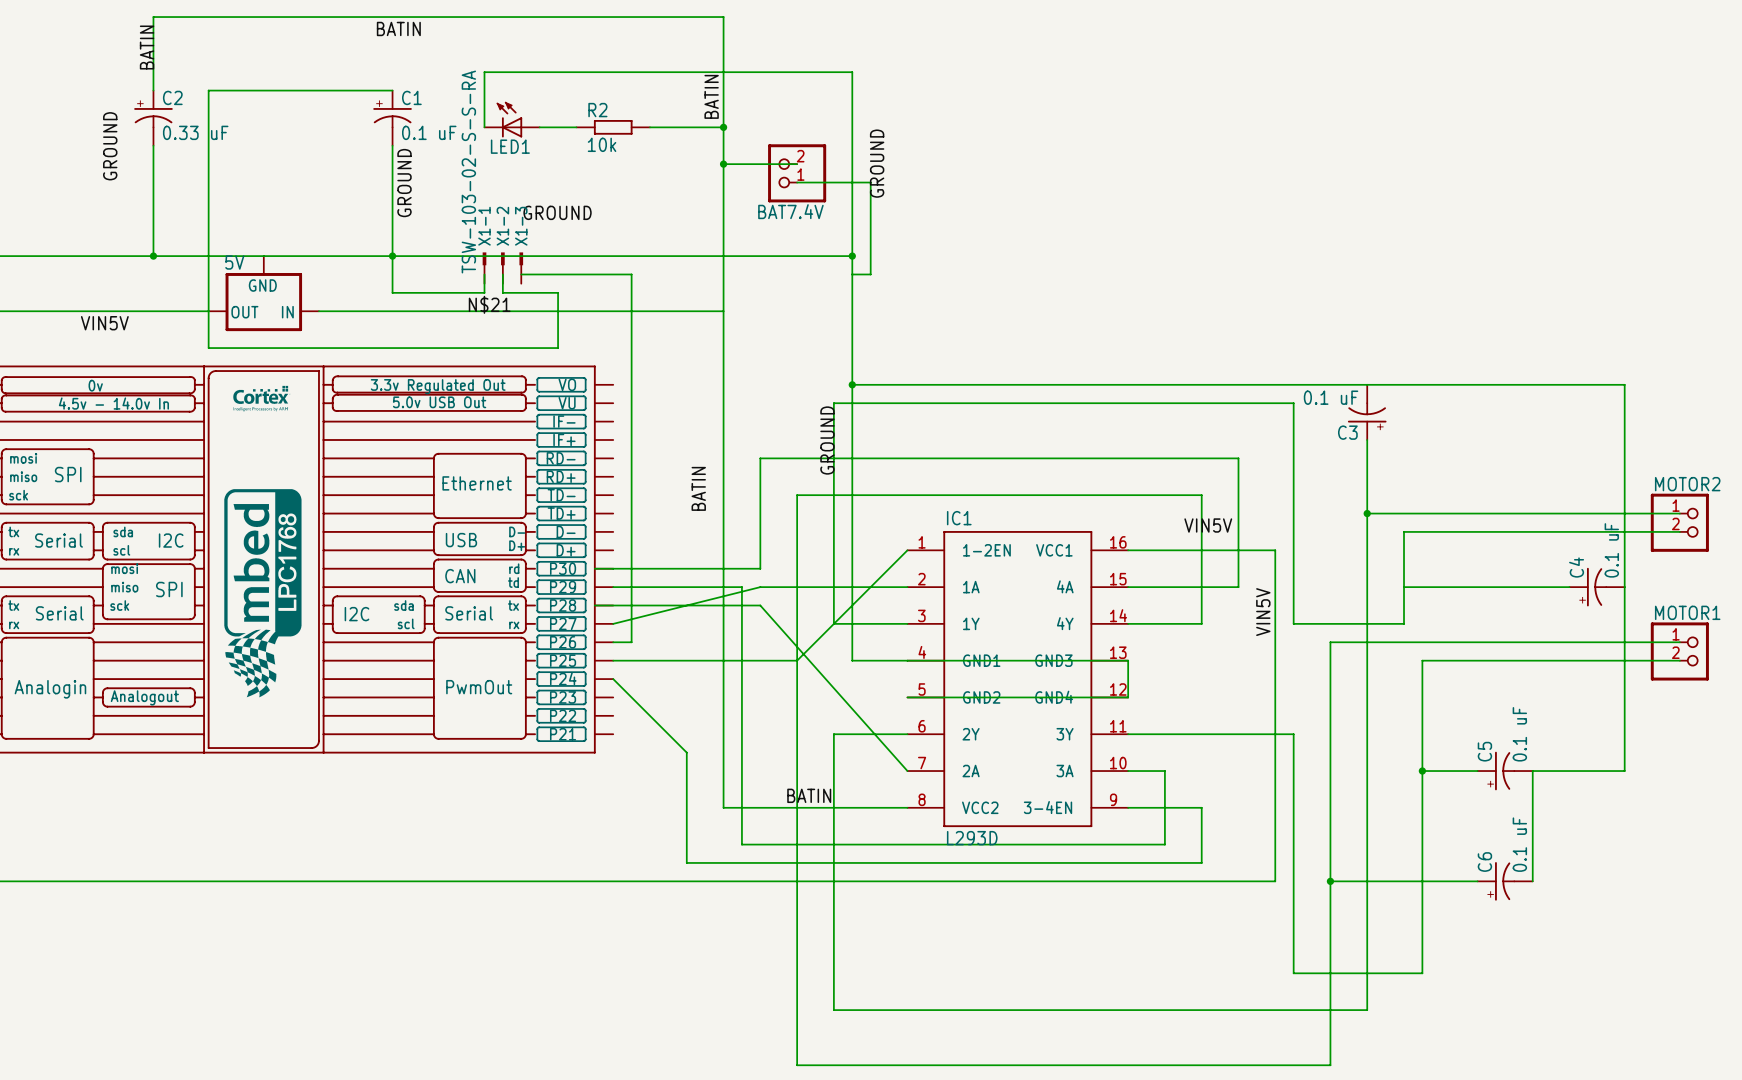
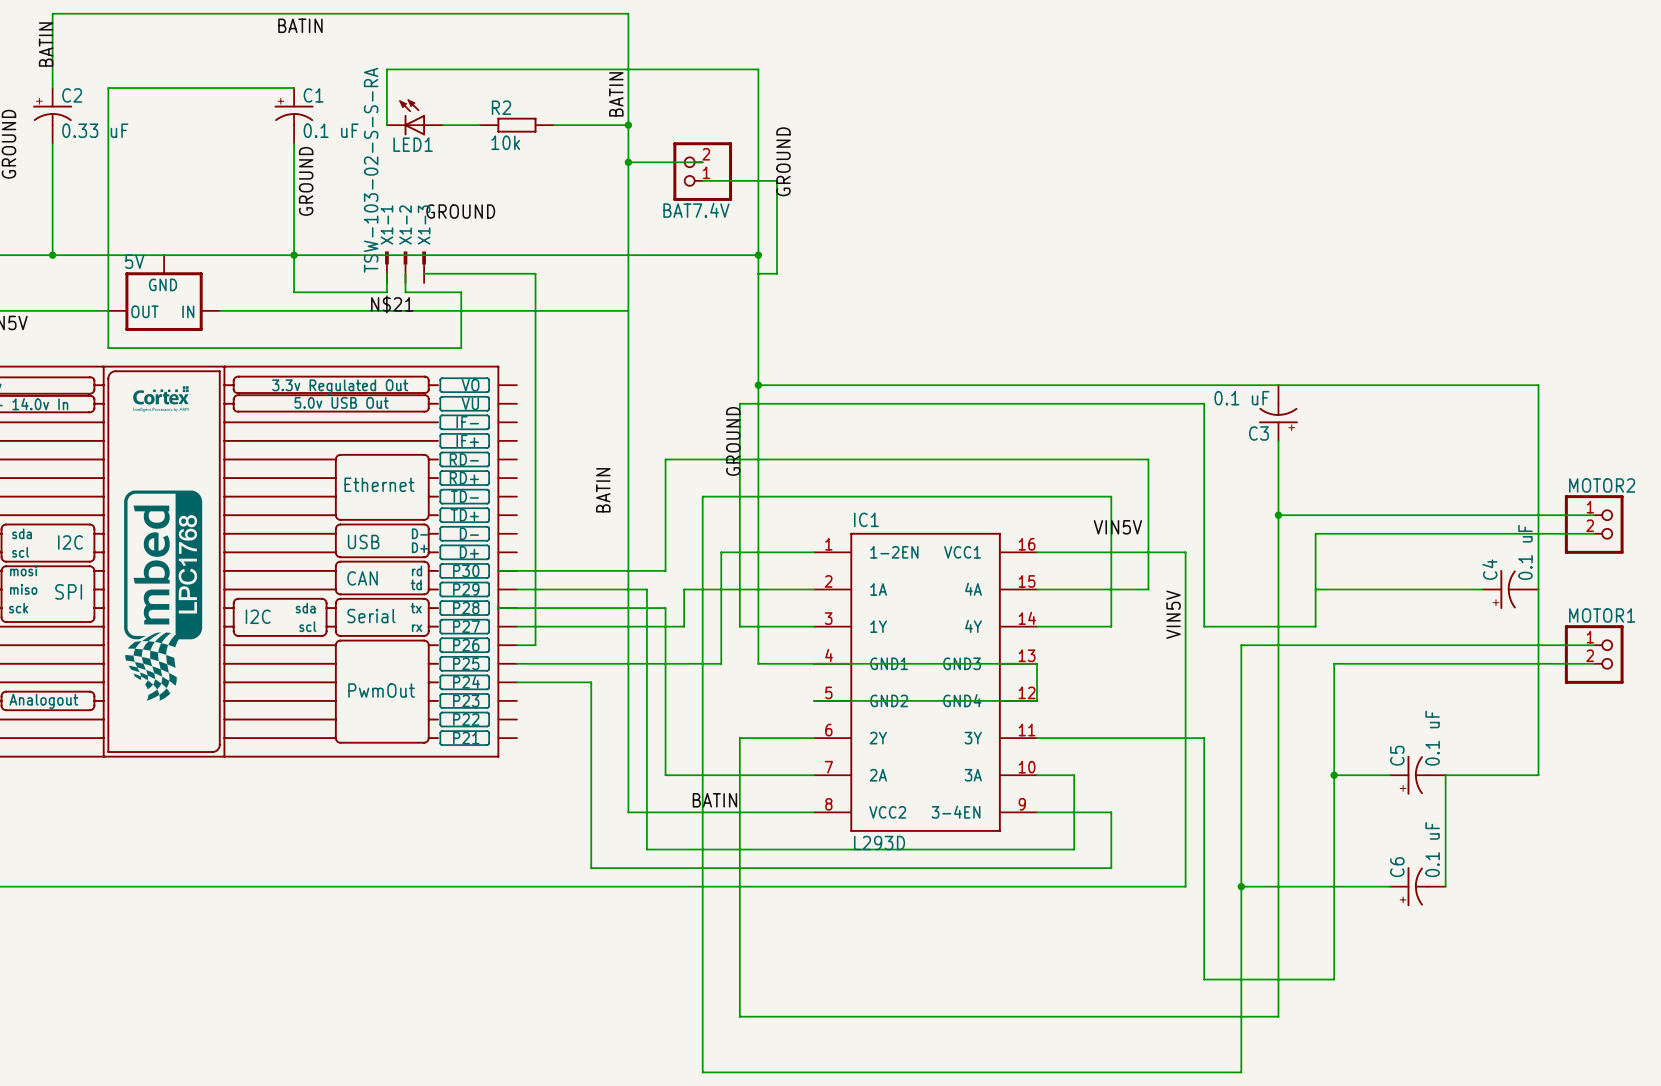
wire: (907, 550) (797, 660) -> (814, 552) (721, 552) (721, 663) (702, 663)
wire: (778, 587) (760, 587) (613, 623) -> (684, 589) (684, 626) (516, 626)
wire: (760, 605) (907, 771) -> (665, 608) (665, 775) (814, 775)
wire: (613, 679) (686, 752) -> (516, 682) (591, 682) (591, 756)

